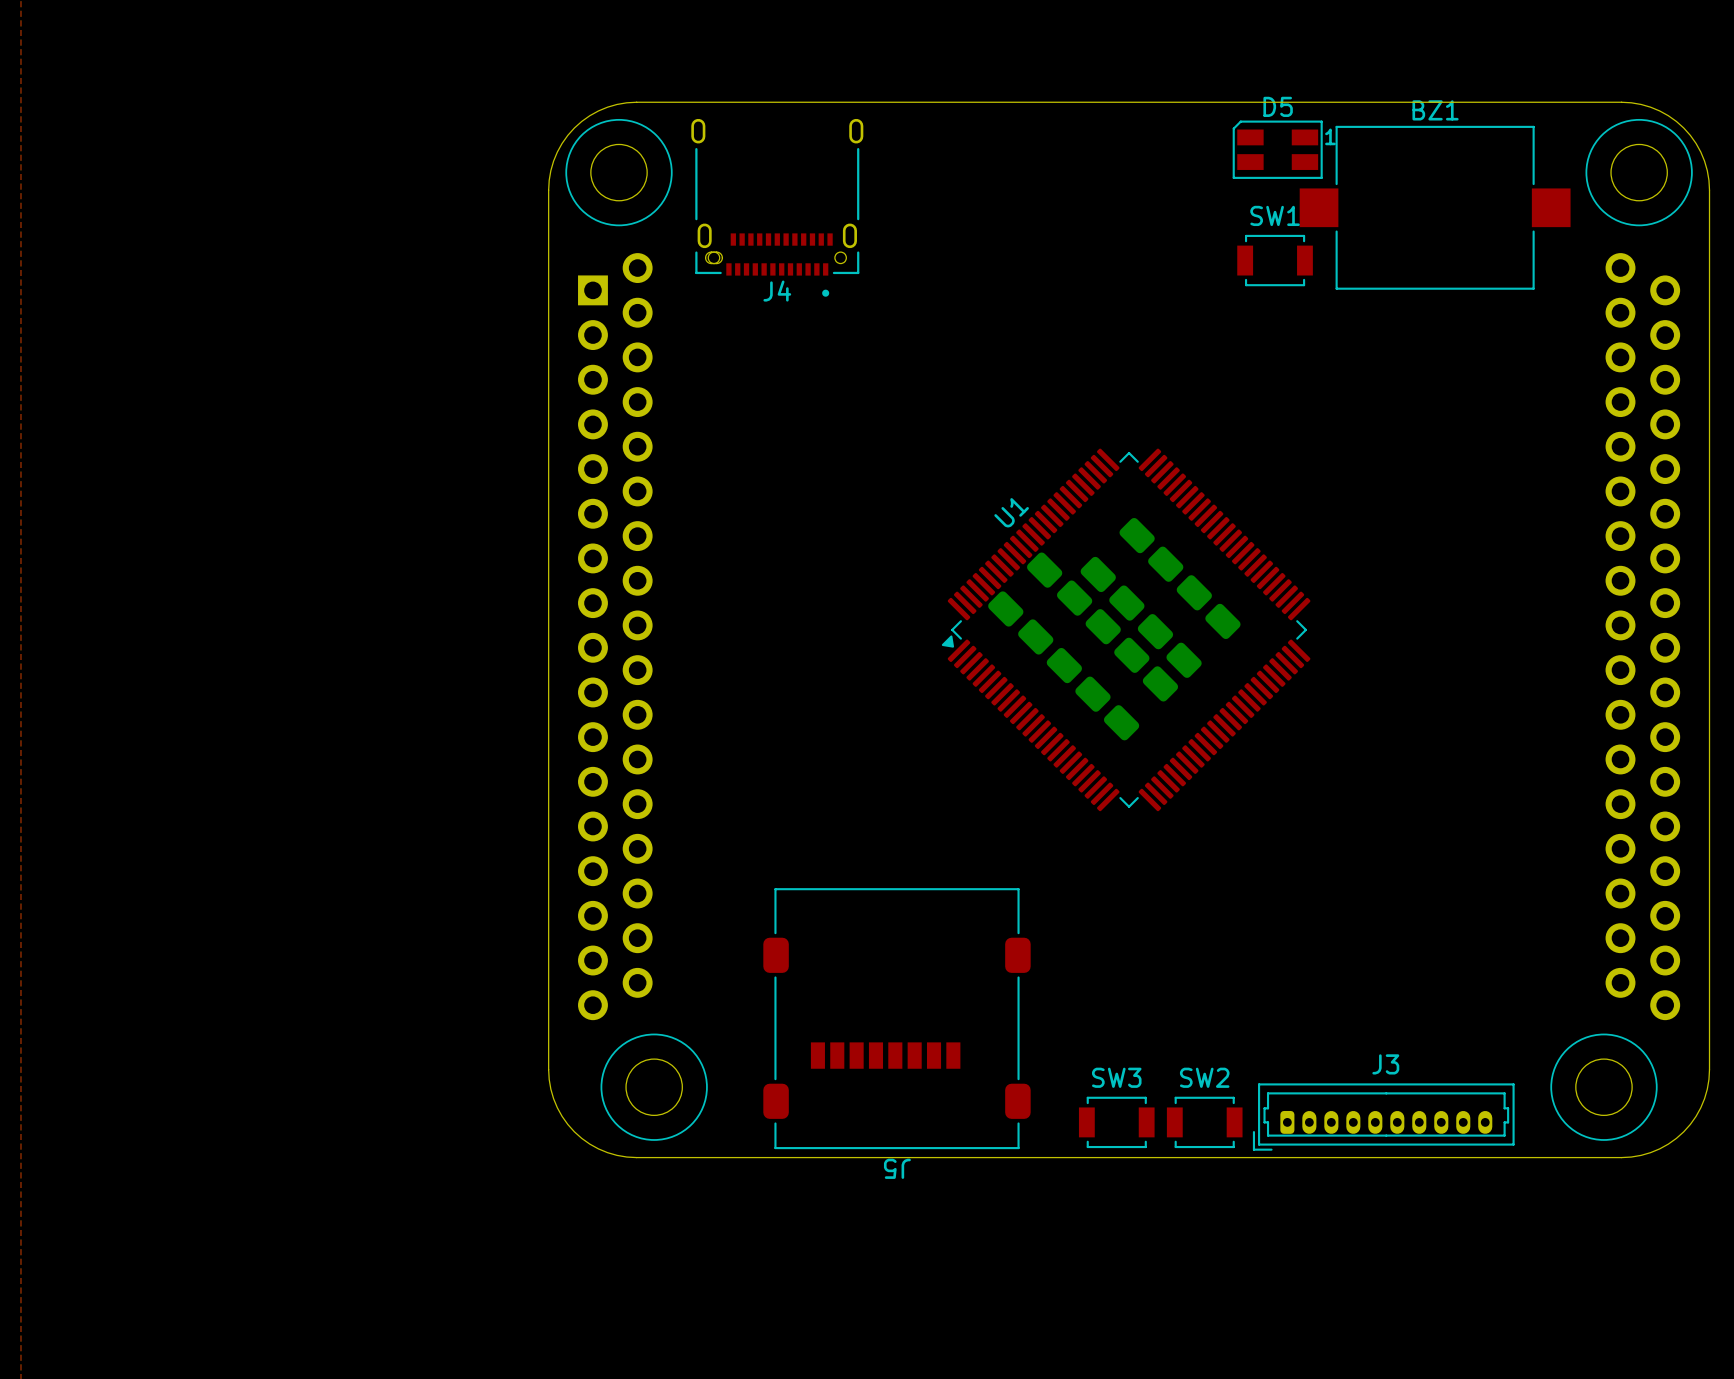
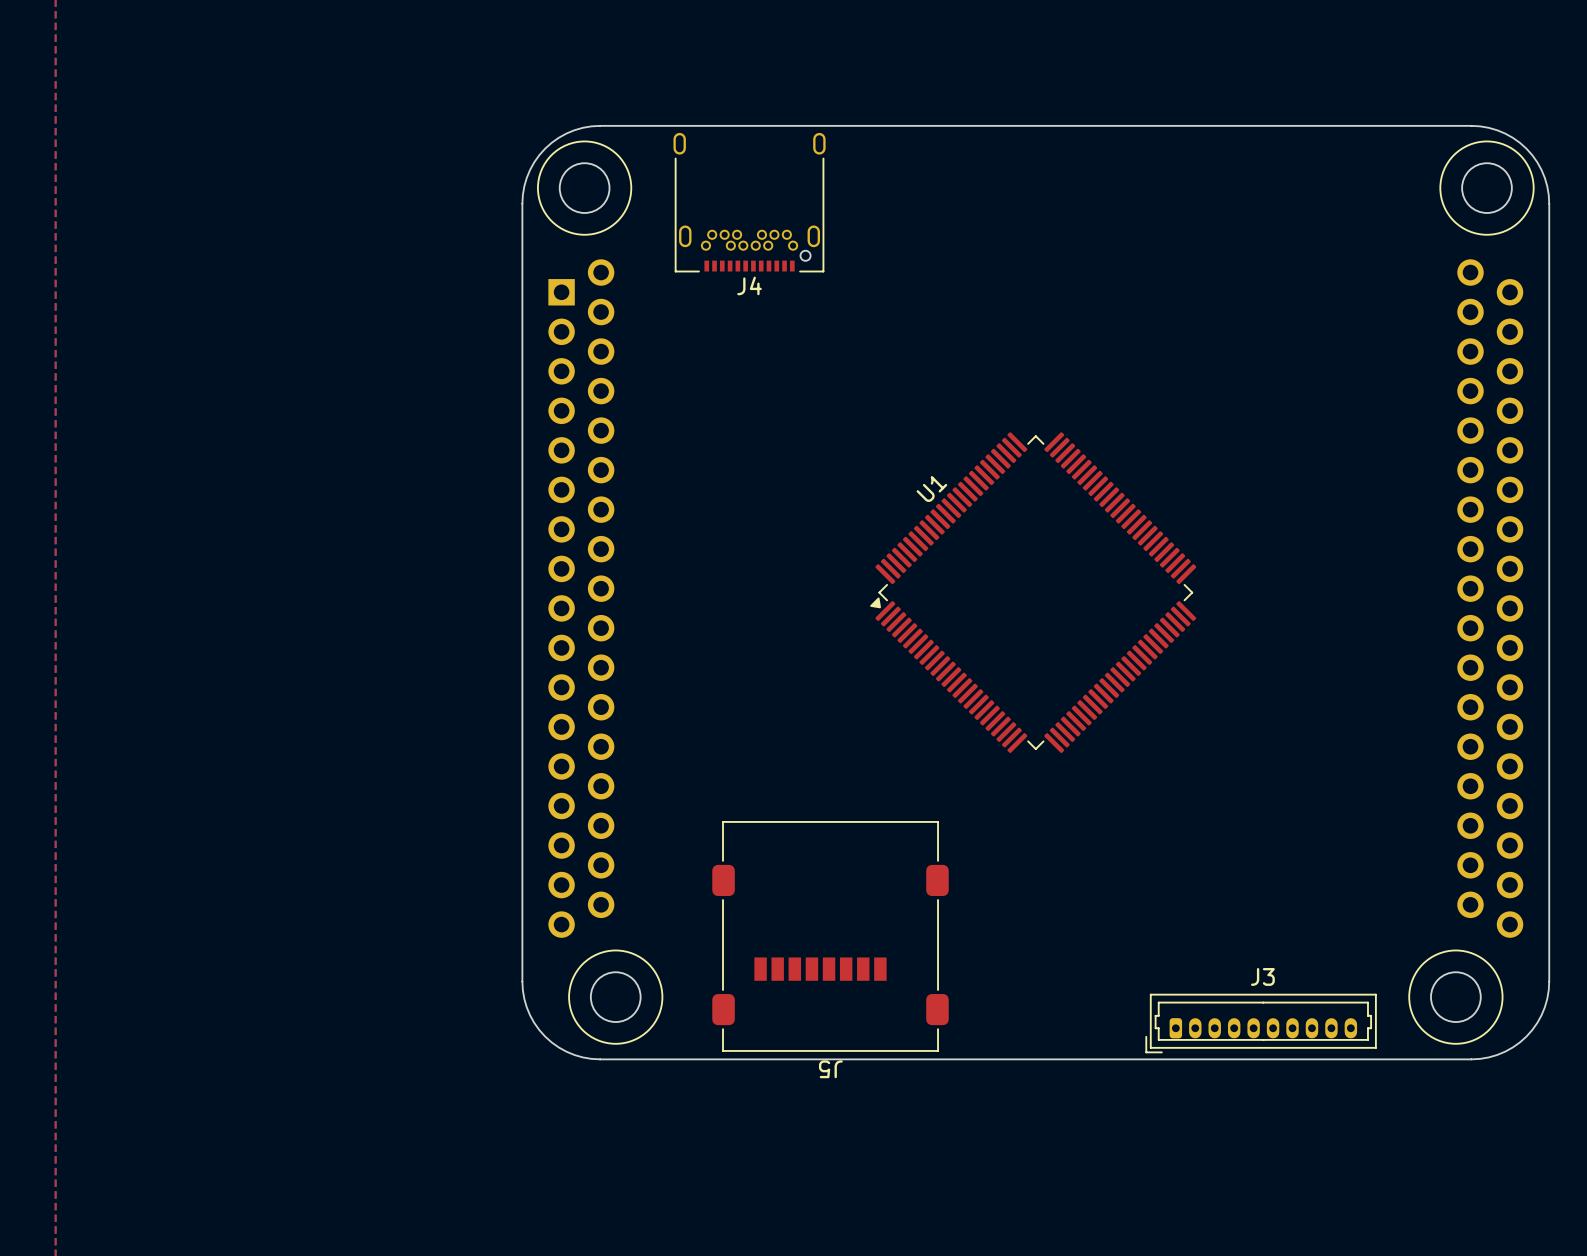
J4 footprint: [691, 118, 864, 297] -> [673, 132, 826, 273]
D5: (1277, 149) -> none
BZ1: (1435, 207) -> none
SW1: (1275, 260) -> none
part: (1117, 555) -> none
part: (1146, 583) -> none
part: (1025, 589) -> none
part: (1174, 612) -> none
part: (1055, 617) -> none
part: (1203, 640) -> none
part: (1083, 646) -> none
part: (1112, 674) -> none
part: (1141, 703) -> none
SW3: (1116, 1122) -> none
SW2: (1204, 1122) -> none

